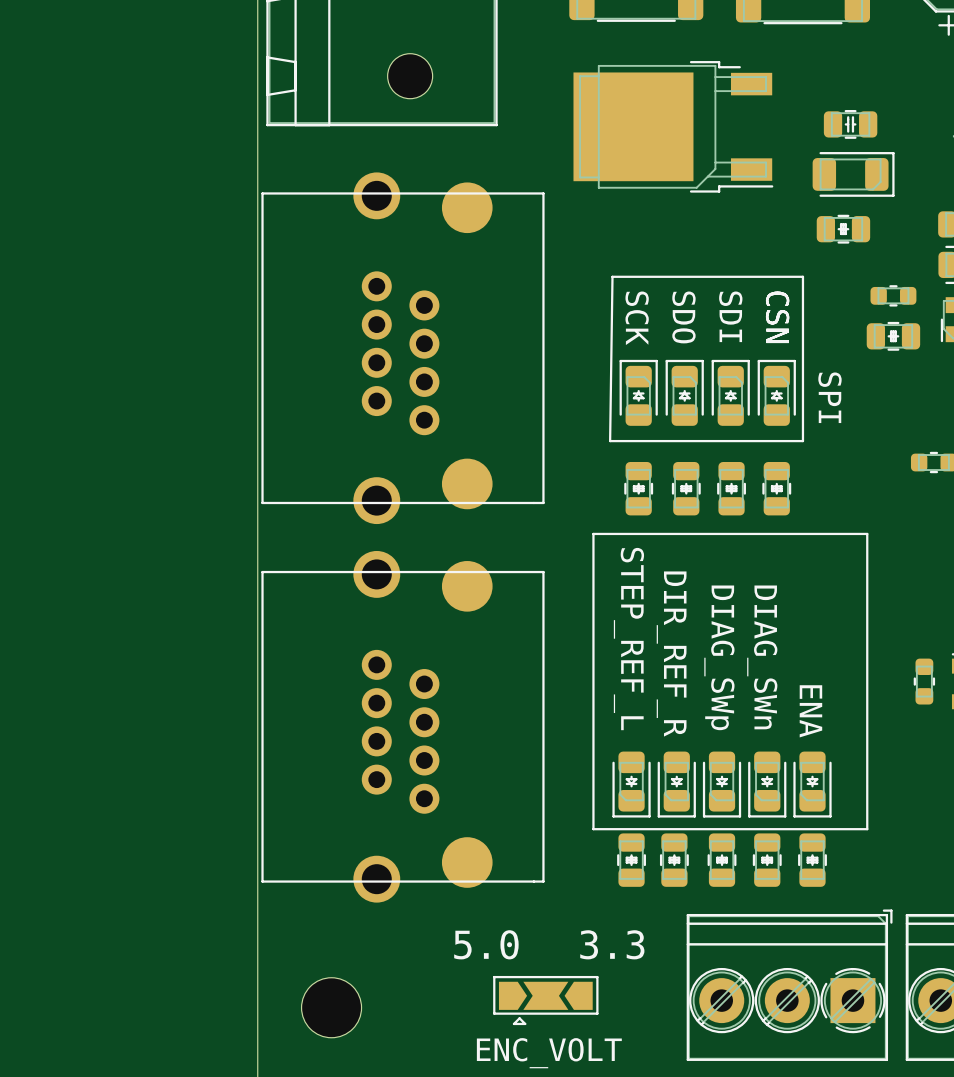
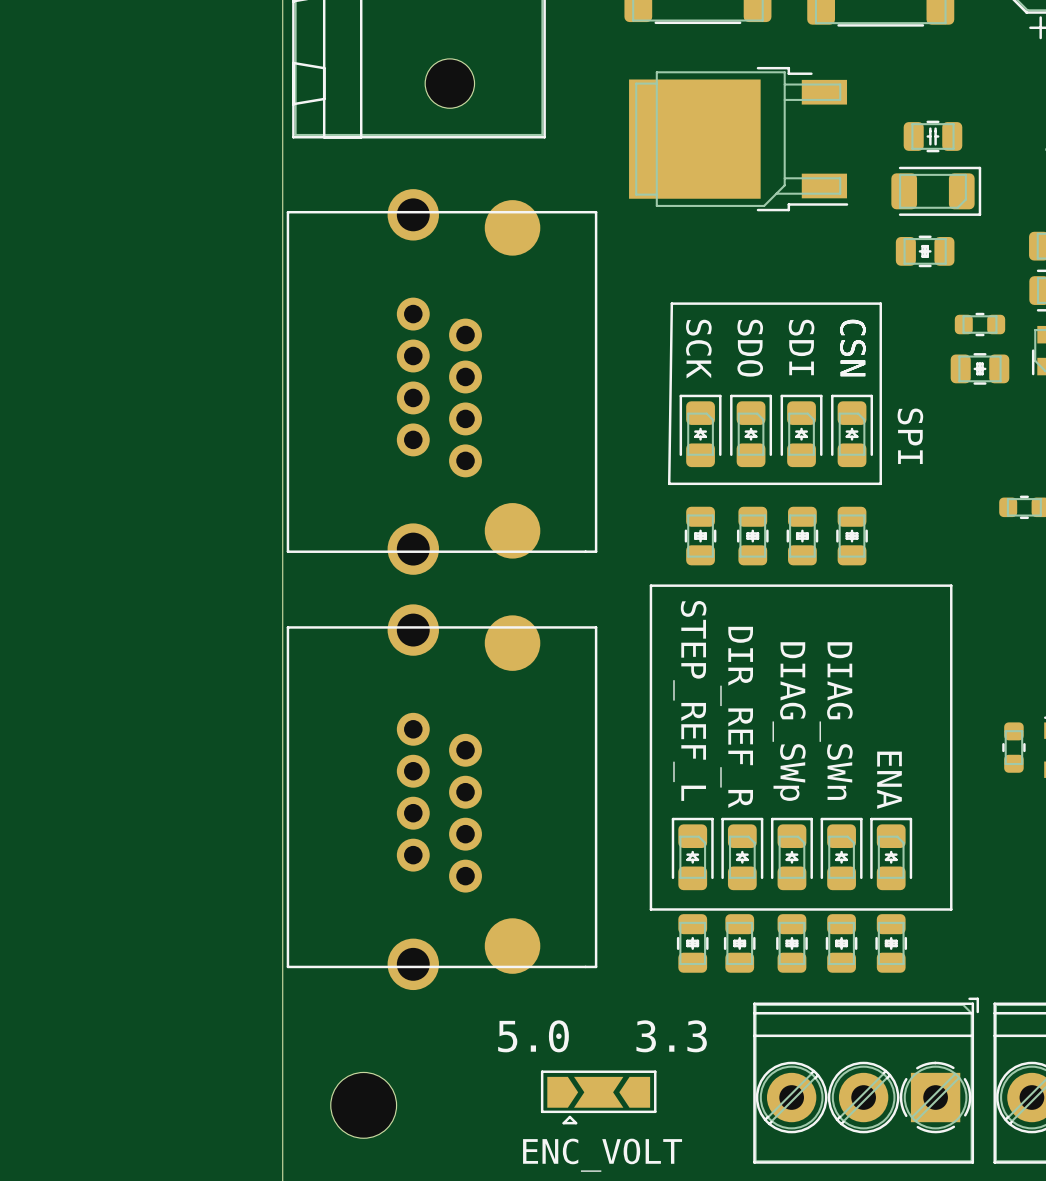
part rotation: 0° (631, 784) -> 180° (692, 853)
part rotation: 0° (676, 784) -> 180° (742, 853)
part rotation: 0° (722, 784) -> 180° (791, 853)
part rotation: 0° (767, 784) -> 180° (841, 853)
part rotation: 0° (812, 784) -> 180° (891, 853)

